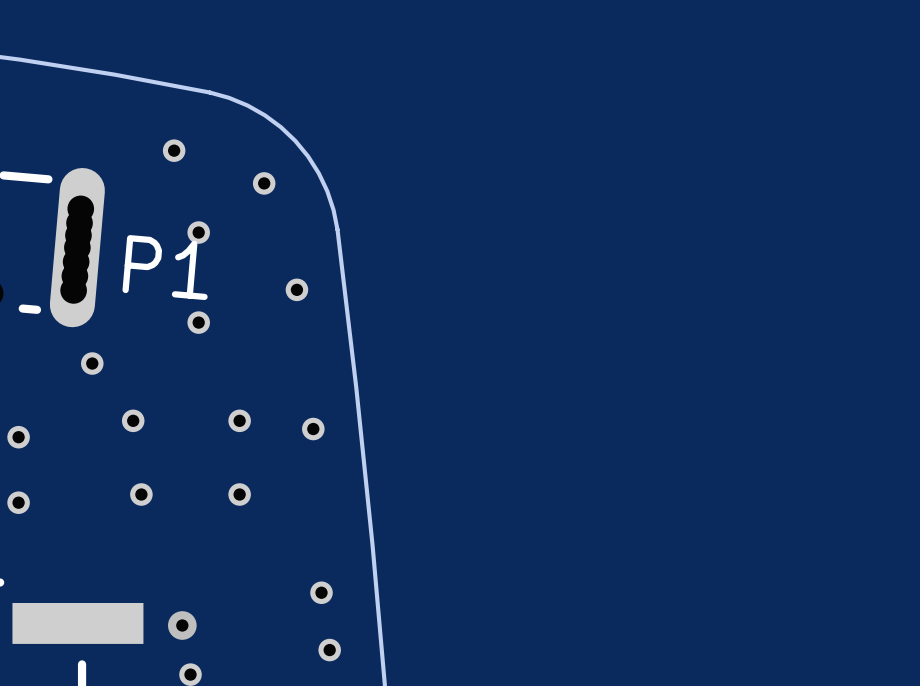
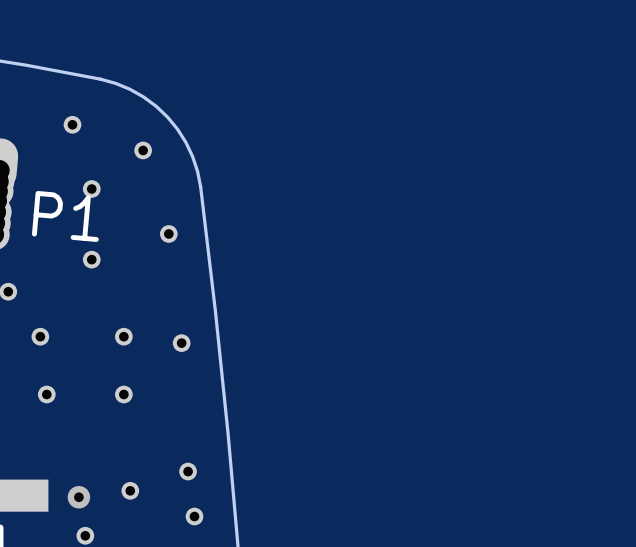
part: none -> (130, 490)

